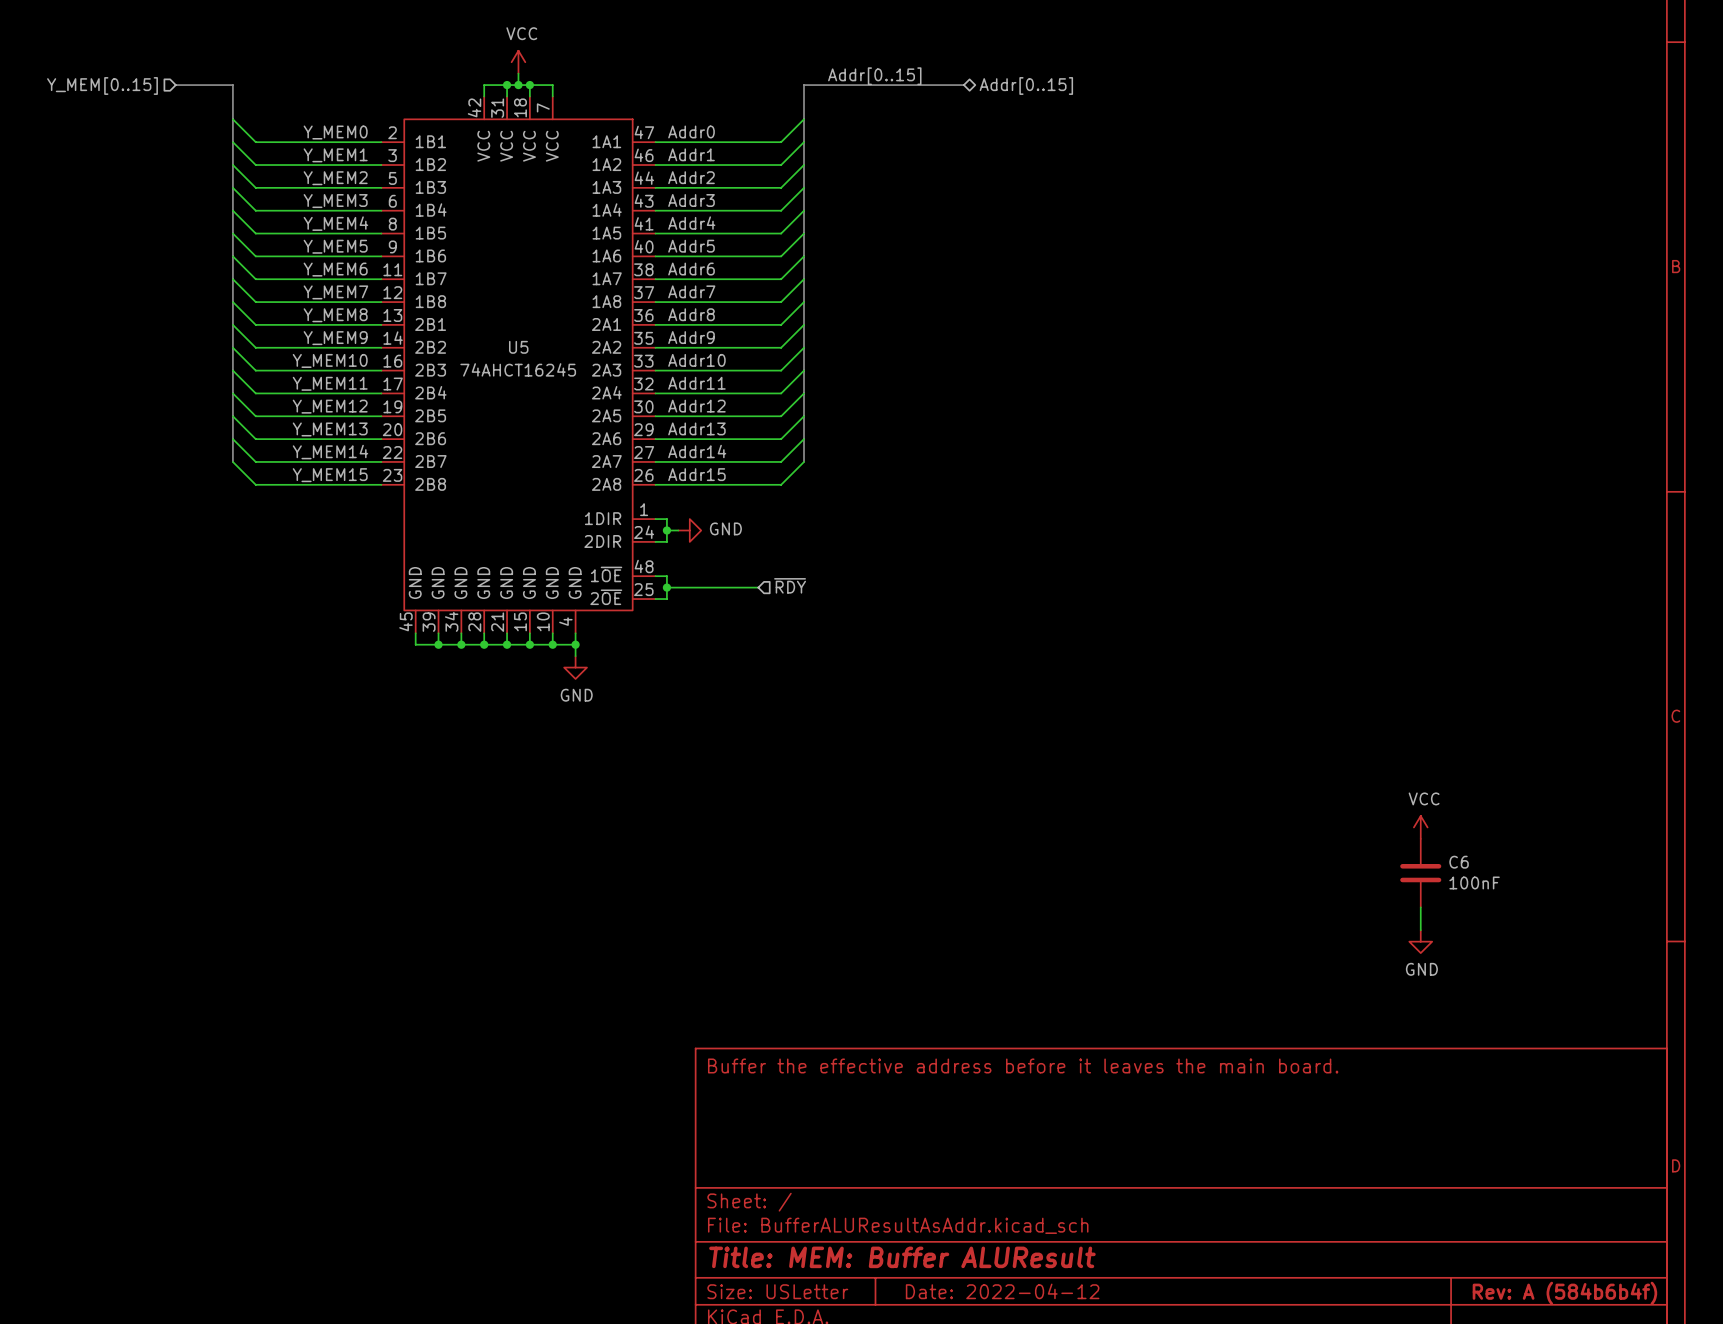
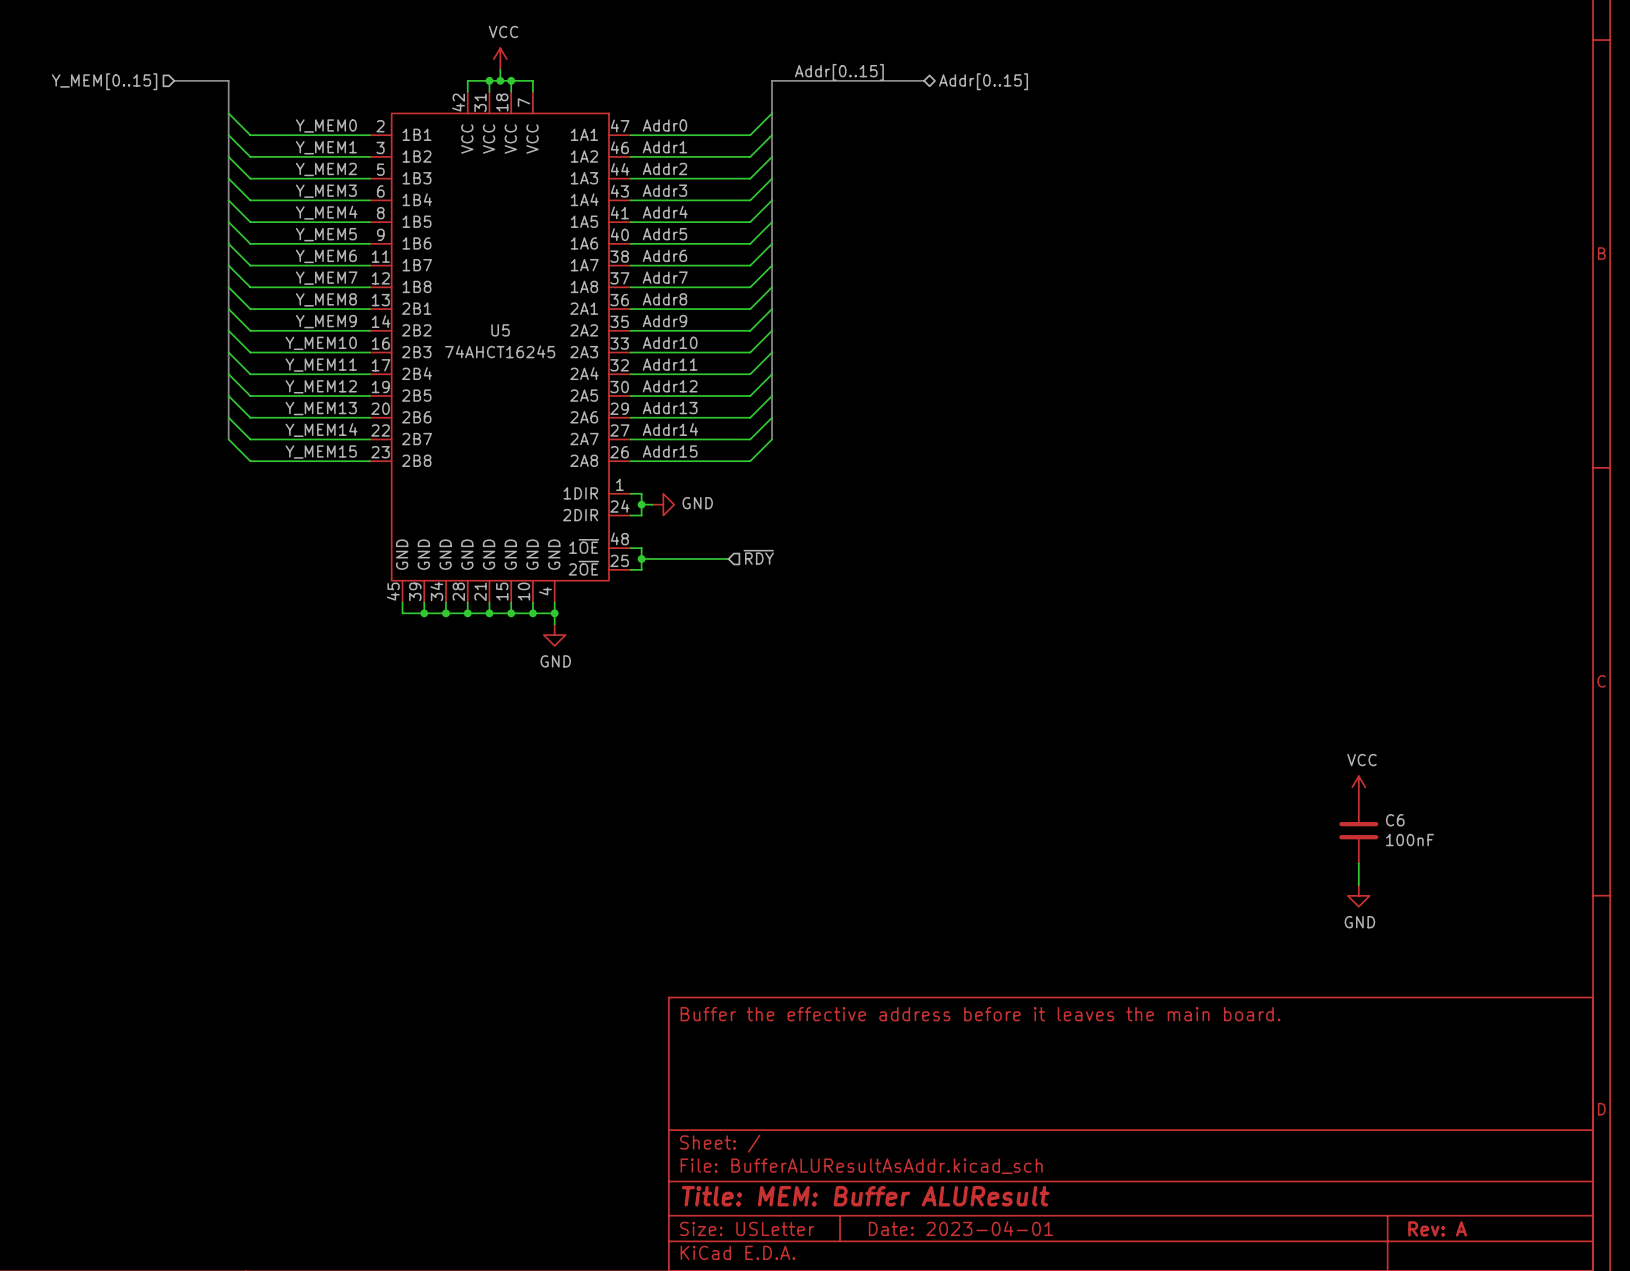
title block: Date: 2022-04-12 (1002, 1291) -> Date: 2023-04-01 (960, 1228)
title block: Rev: A (584b6b4f) (1564, 1293) -> Rev: A (1437, 1228)

